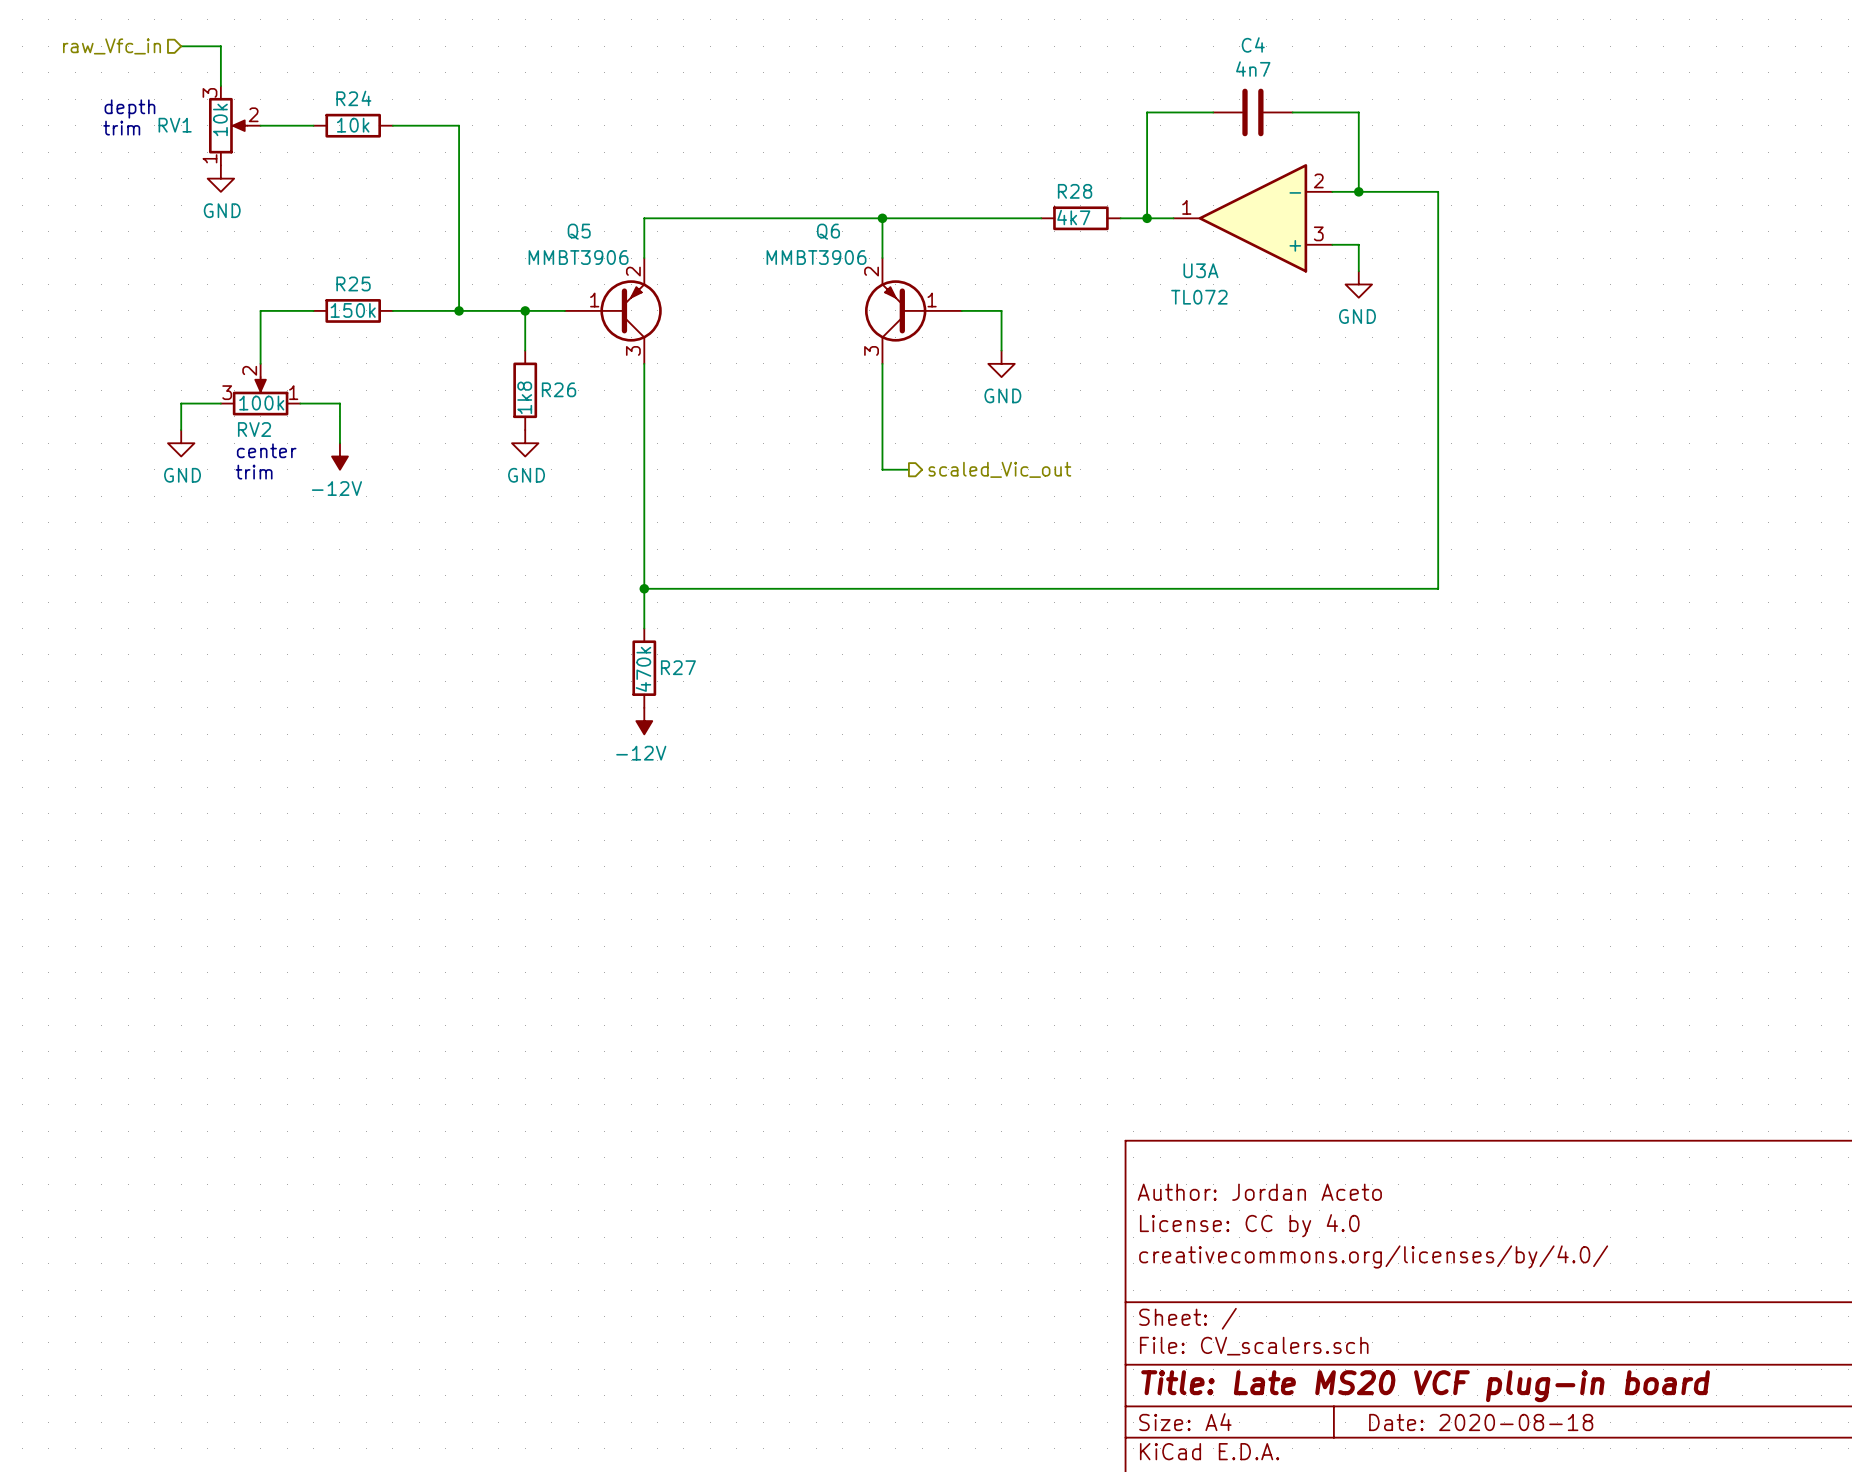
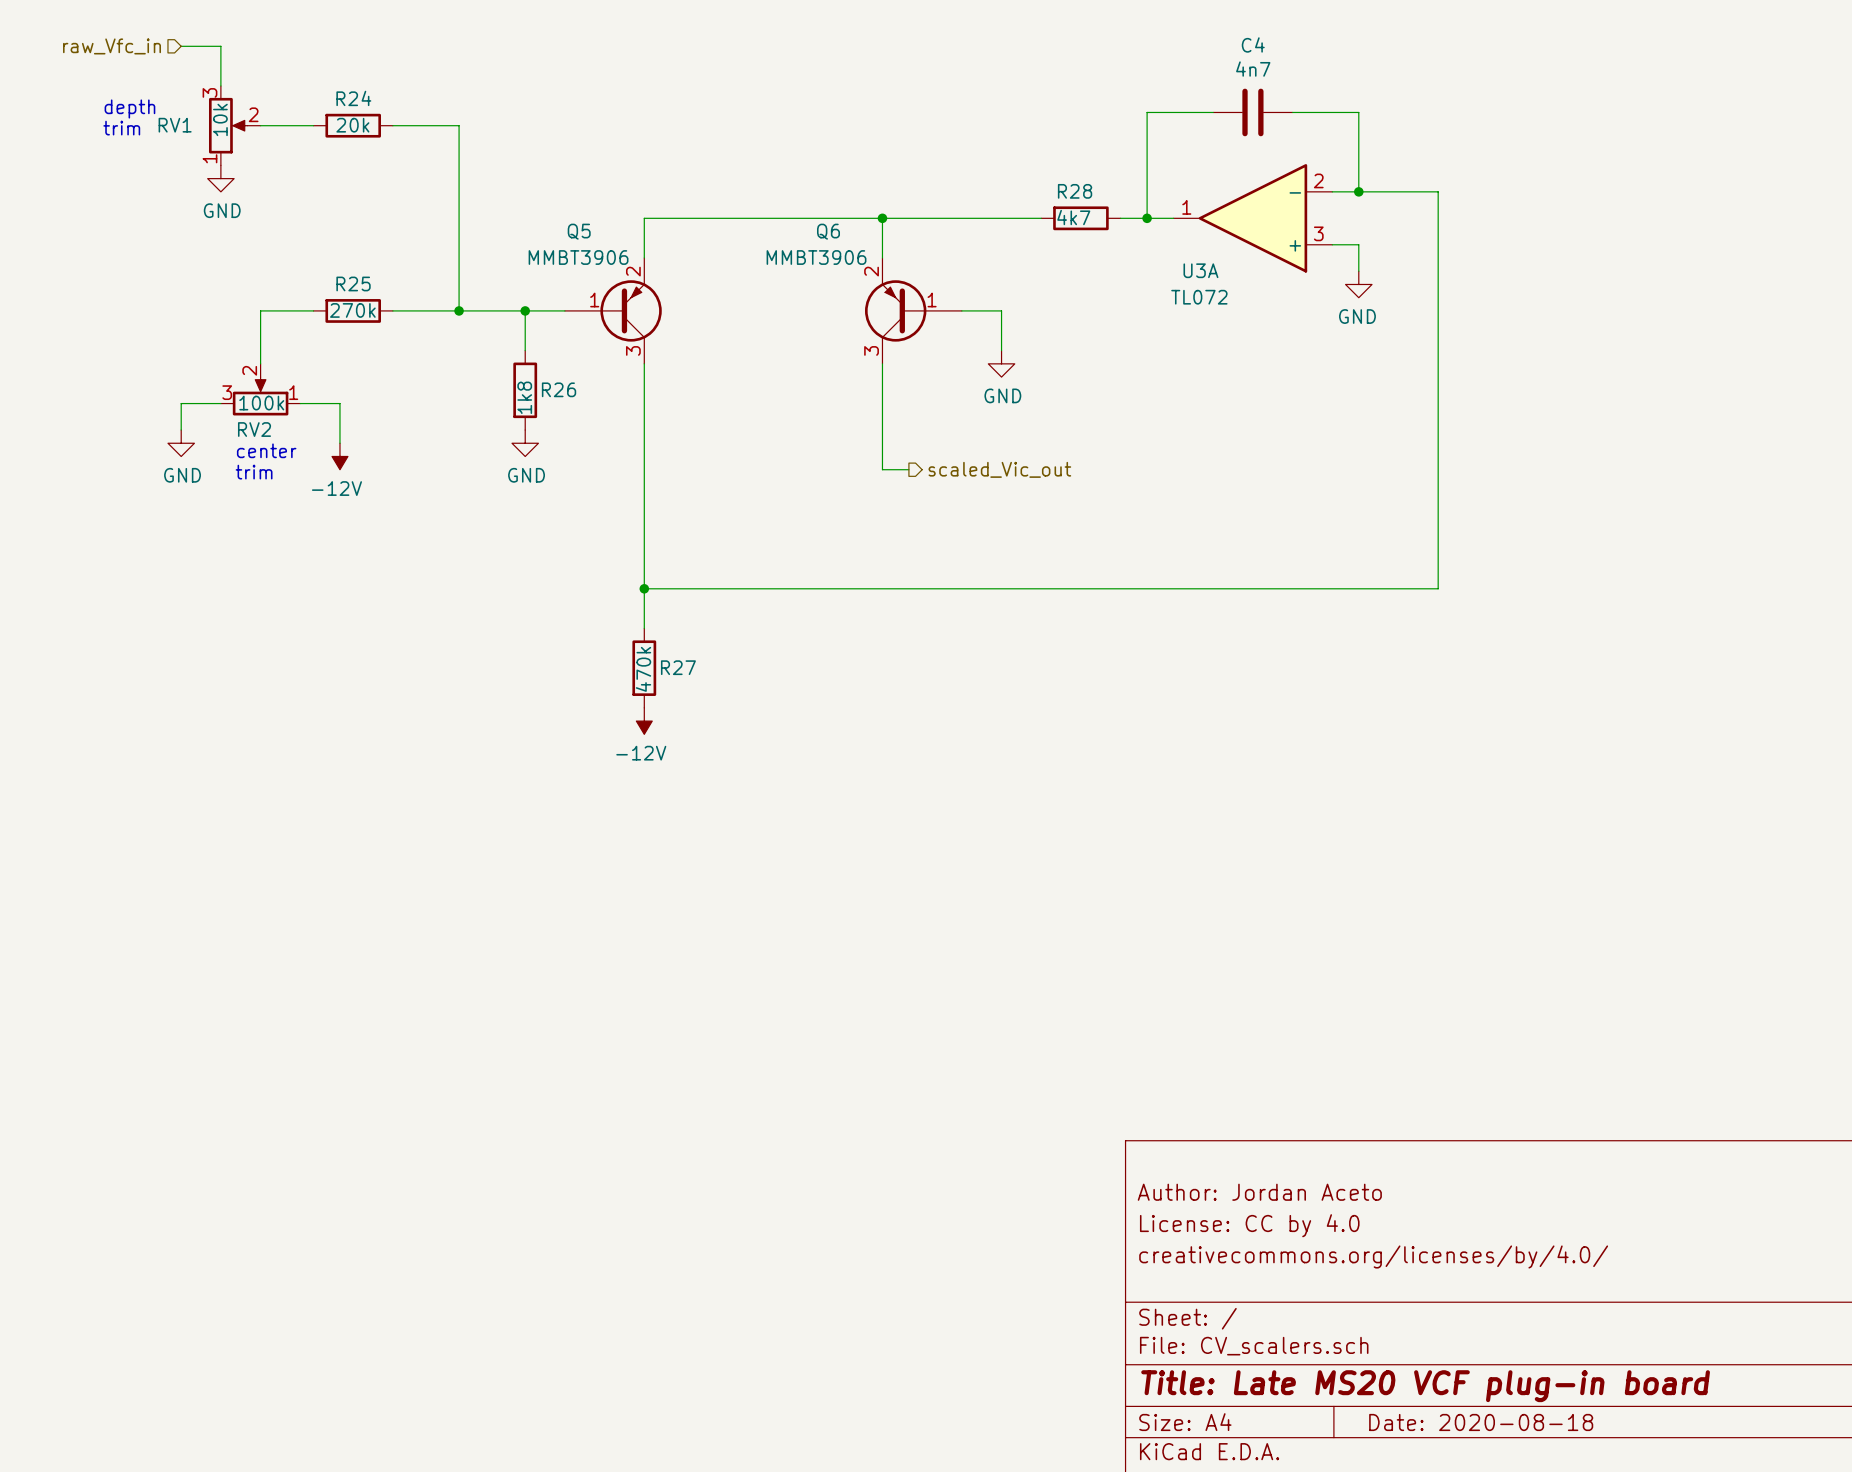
R24 value: 10k (353, 125) -> 20k (352, 125)
R25 value: 150k (353, 310) -> 270k (352, 310)

